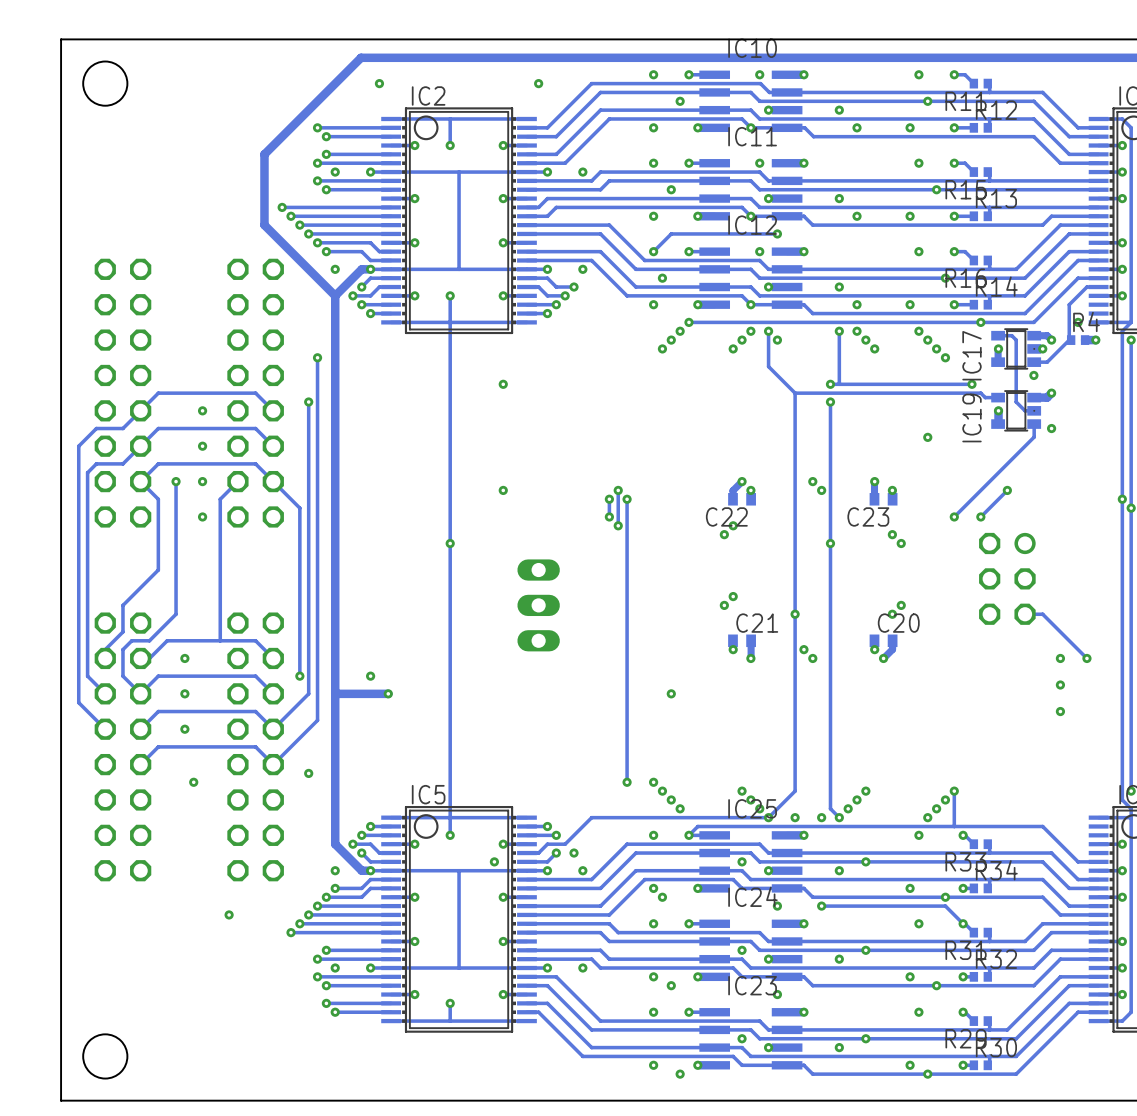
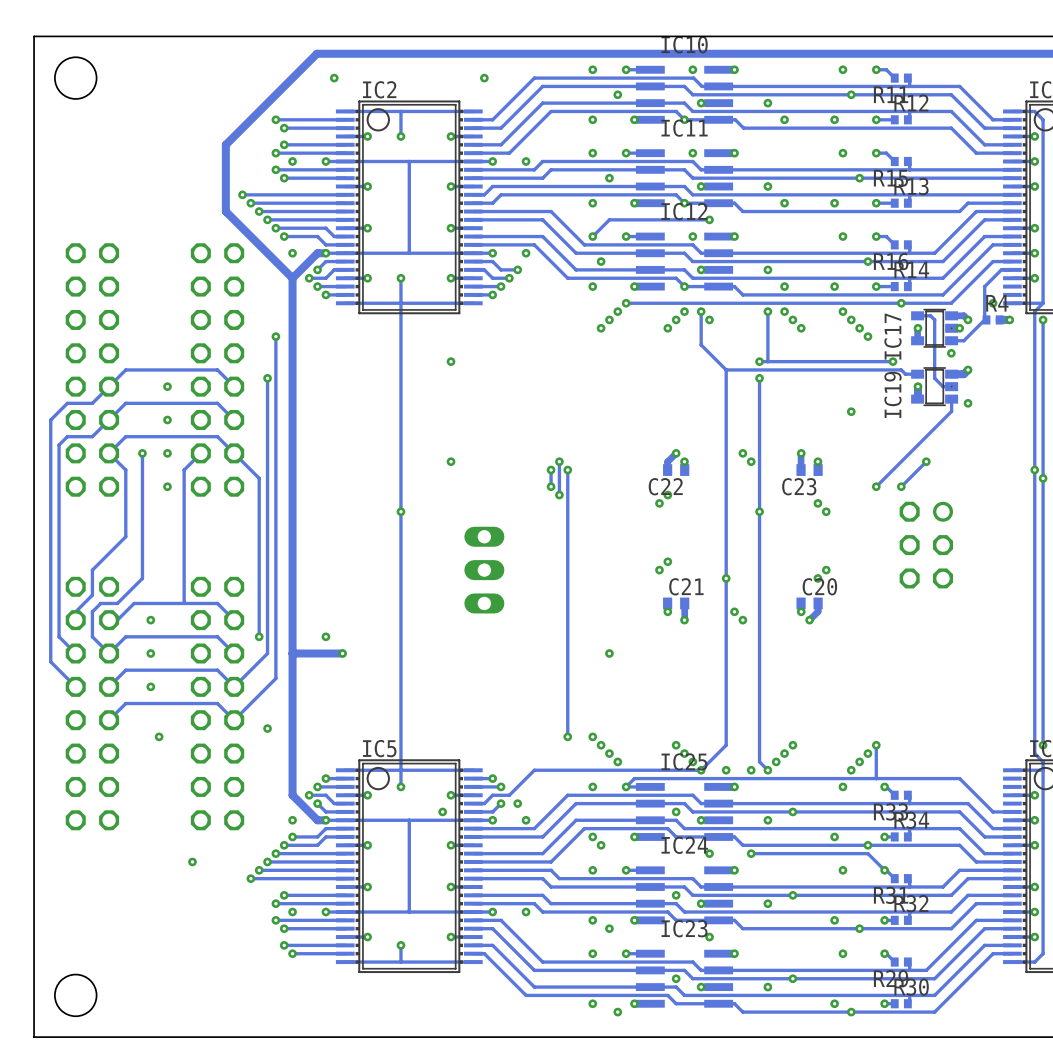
track: (1025, 614) (1042, 614) (1086, 658) -> none
via: (1060, 658) -> none
via: (1086, 658) -> none
via: (1060, 685) -> none
via: (1060, 711) -> none

